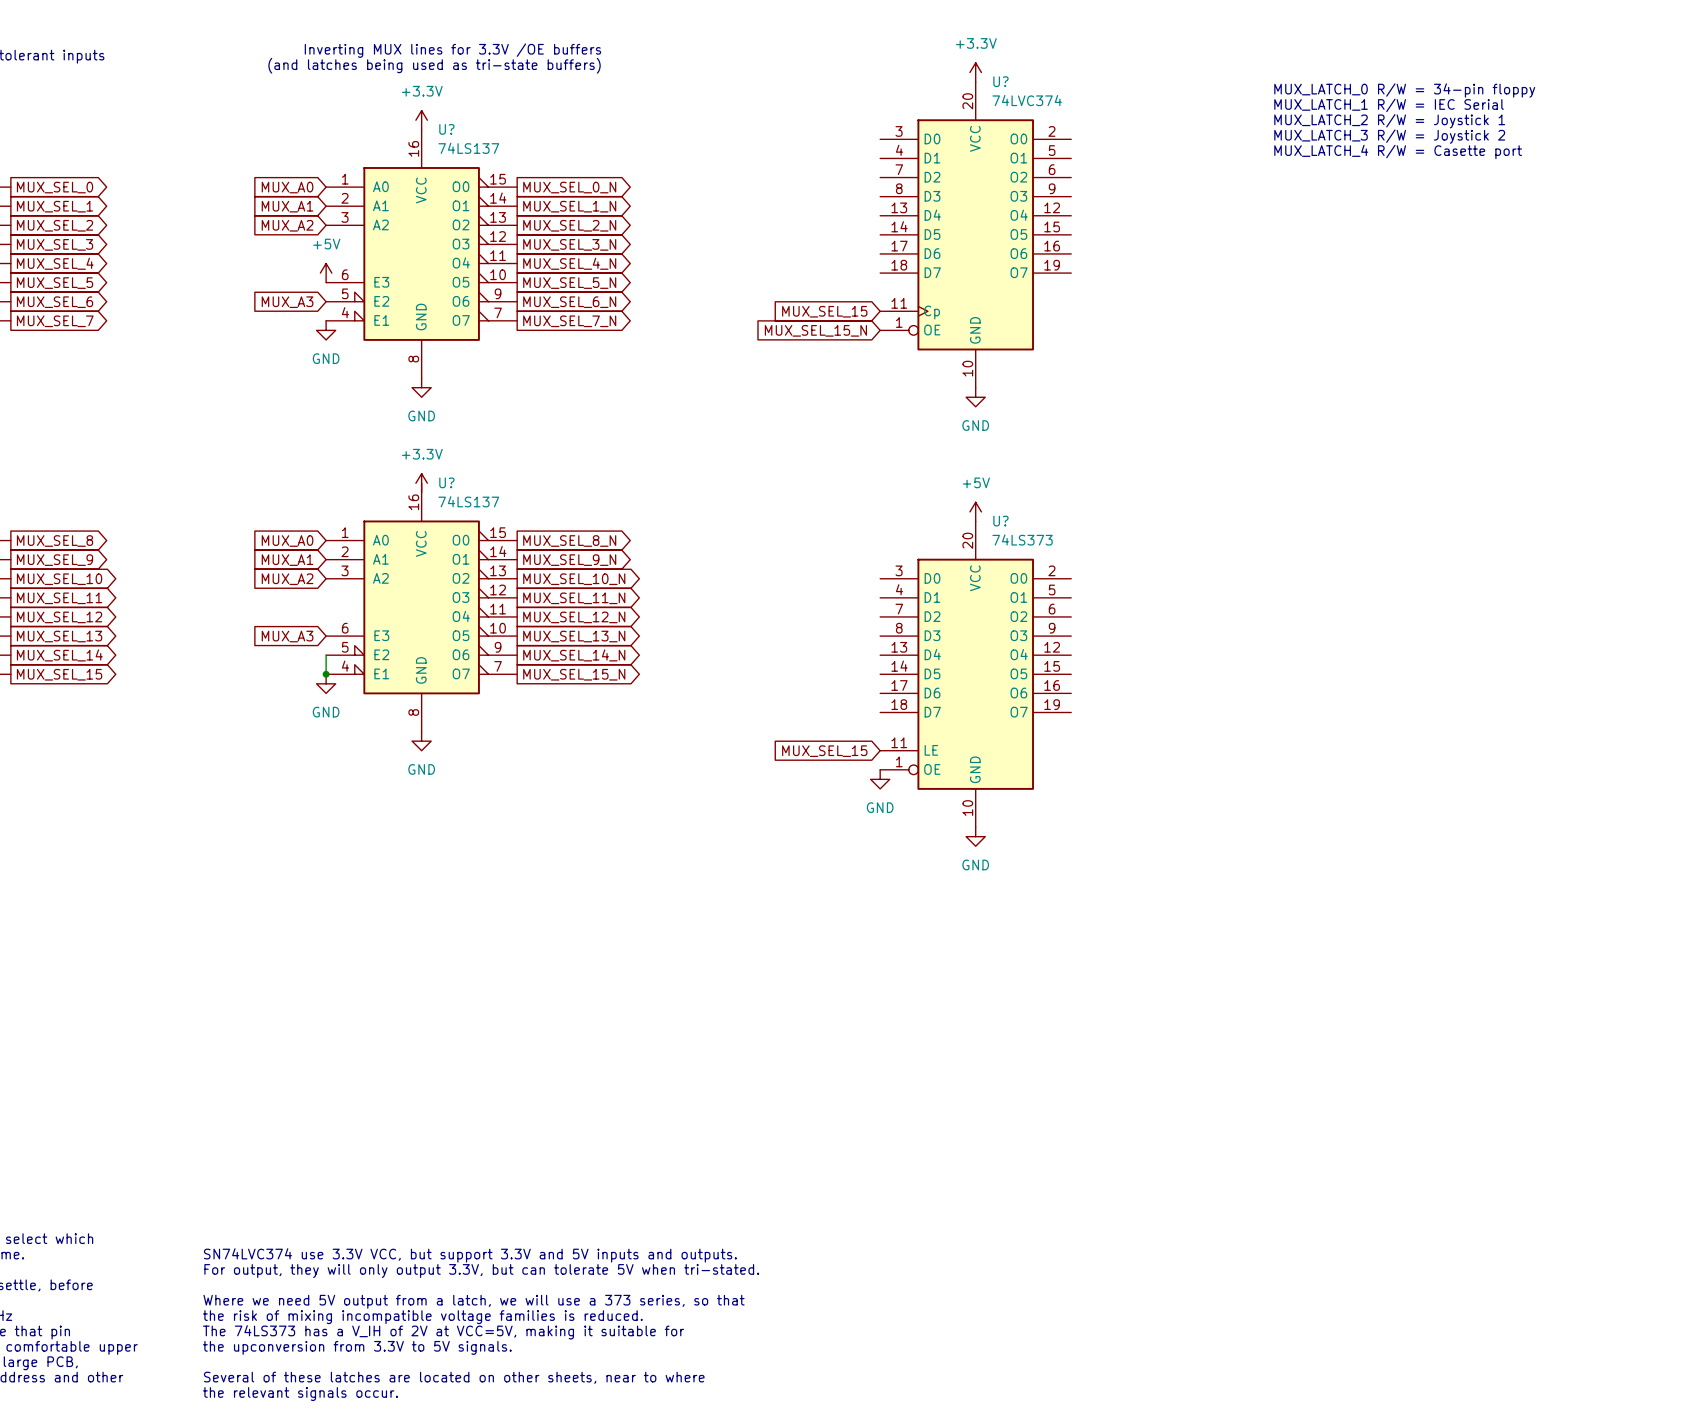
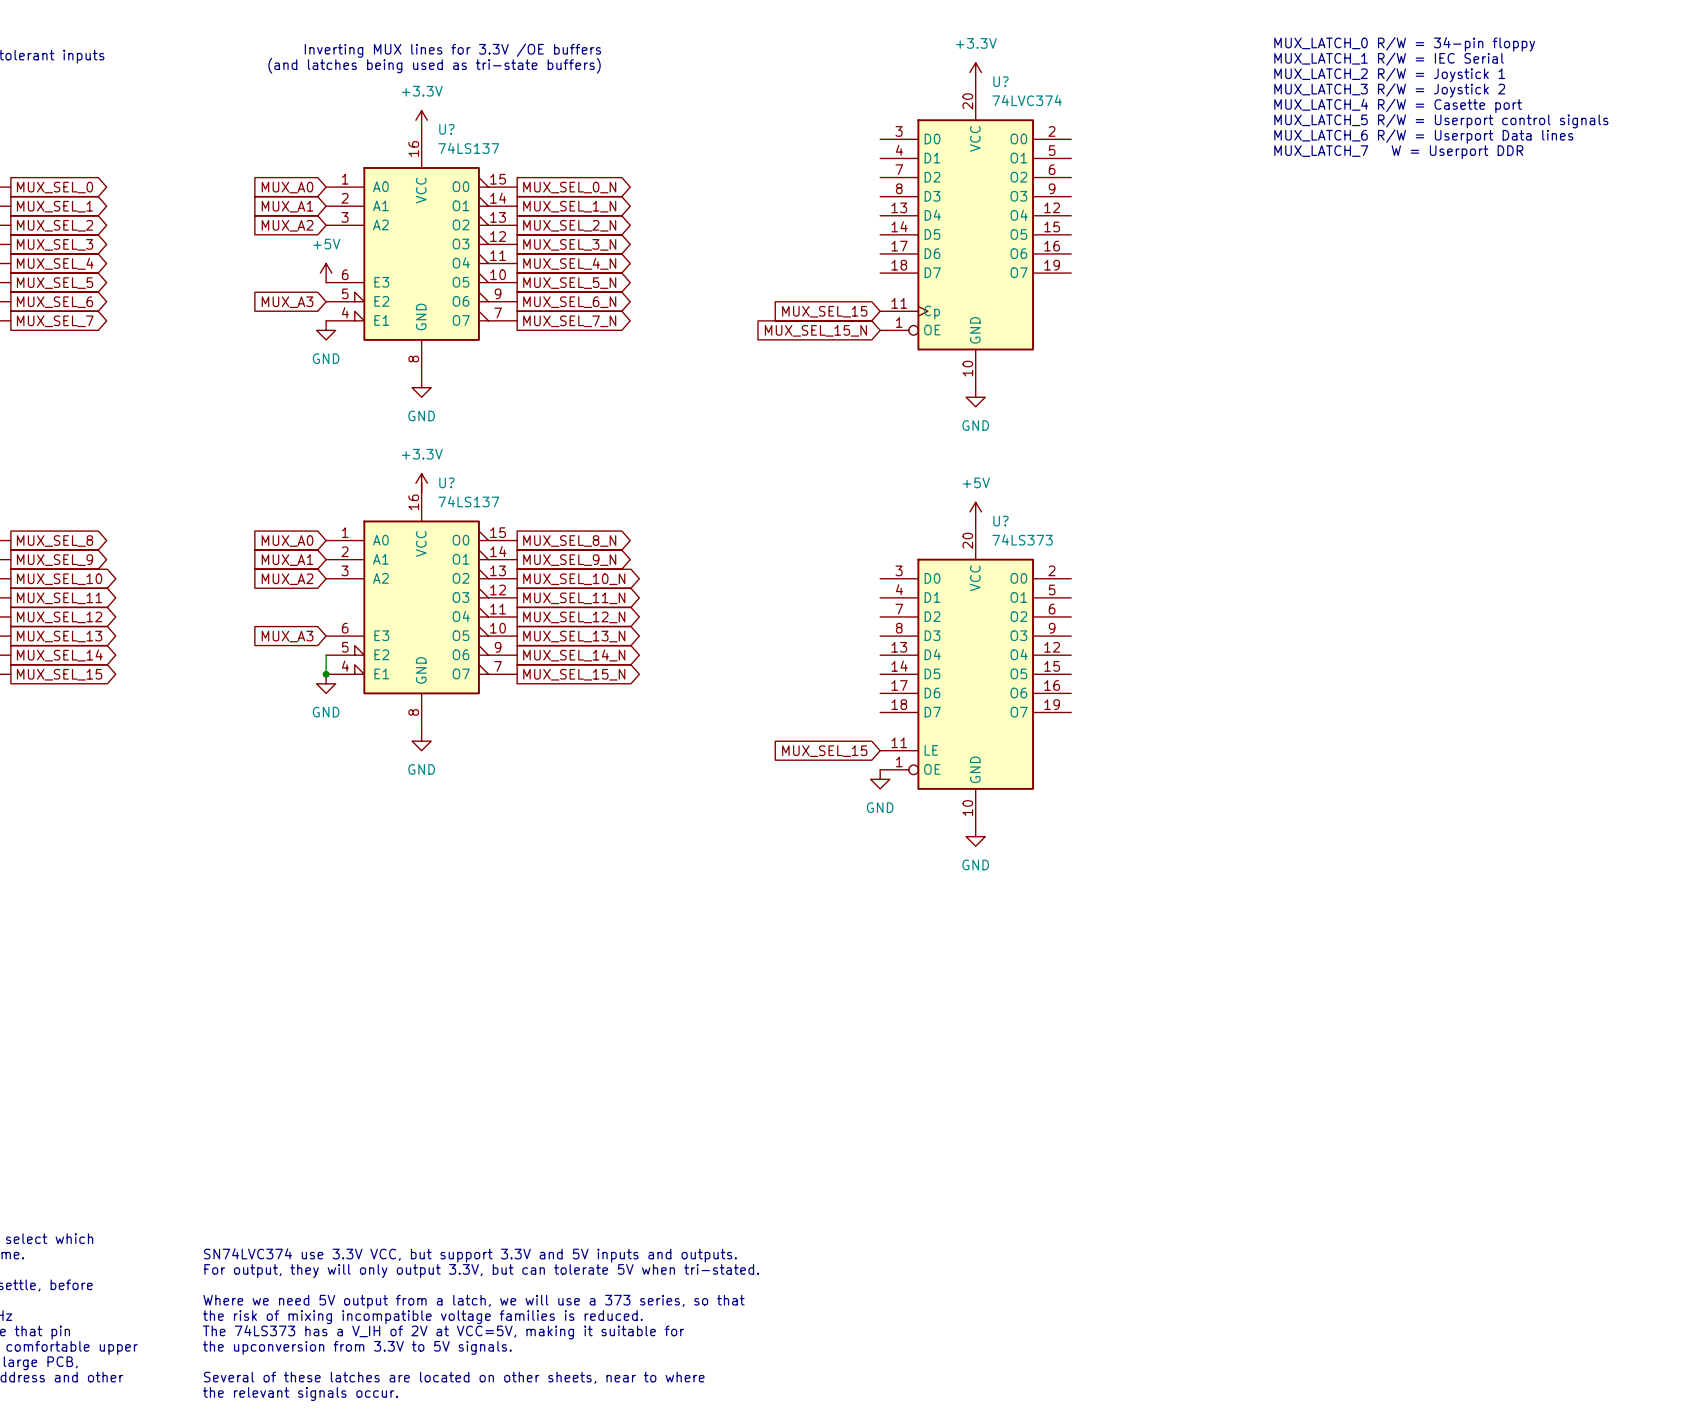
text: none -> MUX_LATCH_0 R/W = 34-pin floppy (1404, 44)
text: none -> MUX_LATCH_1 R/W = IEC Serial (1389, 59)
text: none -> MUX_LATCH_2 R/W = Joystick 1 (1389, 75)
text: MUX_LATCH_0 R/W = 34-pin floppy (1404, 90) -> MUX_LATCH_3 R/W = Joystick 2 (1389, 90)
text: MUX_LATCH_1 R/W = IEC Serial (1389, 105) -> MUX_LATCH_4 R/W = Casette port (1398, 105)
text: MUX_LATCH_2 R/W = Joystick 1 (1389, 121) -> MUX_LATCH_5 R/W = Userport control signals (1441, 121)
text: MUX_LATCH_3 R/W = Joystick 2 (1389, 136) -> MUX_LATCH_6 R/W = Userport Data lines (1423, 136)
text: MUX_LATCH_4 R/W = Casette port (1398, 151) -> MUX_LATCH_7 W = Userport DDR (1398, 152)

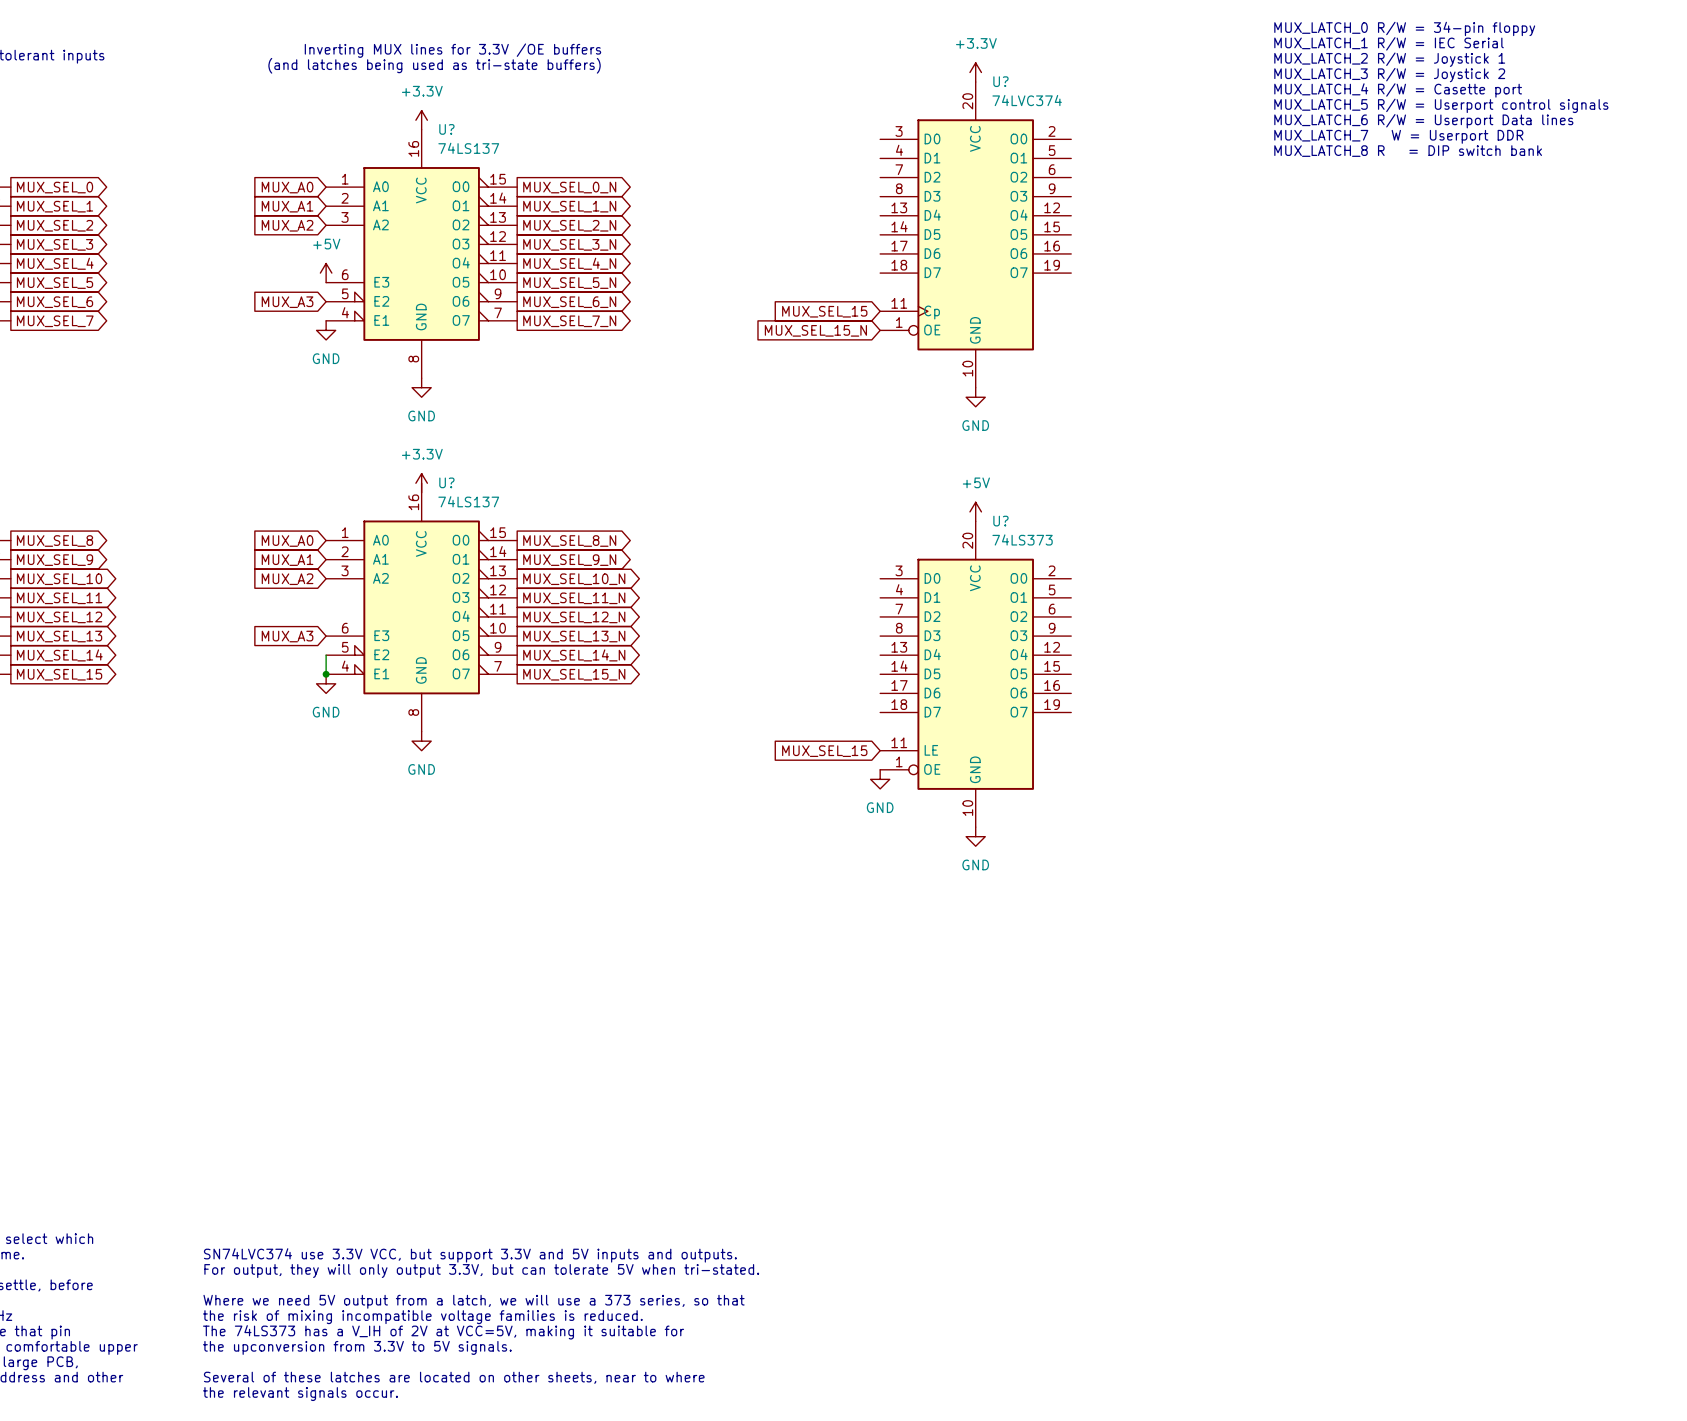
text: none -> MUX_LATCH_0 R/W = 34-pin floppy (1404, 28)
text: MUX_LATCH_0 R/W = 34-pin floppy (1404, 44) -> MUX_LATCH_1 R/W = IEC Serial (1389, 43)
text: MUX_LATCH_1 R/W = IEC Serial (1389, 59) -> MUX_LATCH_2 R/W = Joystick 1 (1389, 59)
text: MUX_LATCH_2 R/W = Joystick 1 (1389, 75) -> MUX_LATCH_3 R/W = Joystick 2 (1389, 75)
text: MUX_LATCH_3 R/W = Joystick 2 (1389, 90) -> MUX_LATCH_4 R/W = Casette port (1398, 90)
text: MUX_LATCH_4 R/W = Casette port (1398, 105) -> MUX_LATCH_5 R/W = Userport control signals (1441, 105)
text: MUX_LATCH_5 R/W = Userport control signals (1441, 121) -> MUX_LATCH_6 R/W = Userport Data lines (1423, 121)
text: MUX_LATCH_6 R/W = Userport Data lines (1423, 136) -> MUX_LATCH_7 W = Userport DDR (1398, 136)
text: MUX_LATCH_7 W = Userport DDR (1398, 152) -> MUX_LATCH_8 R = DIP switch bank (1408, 151)

